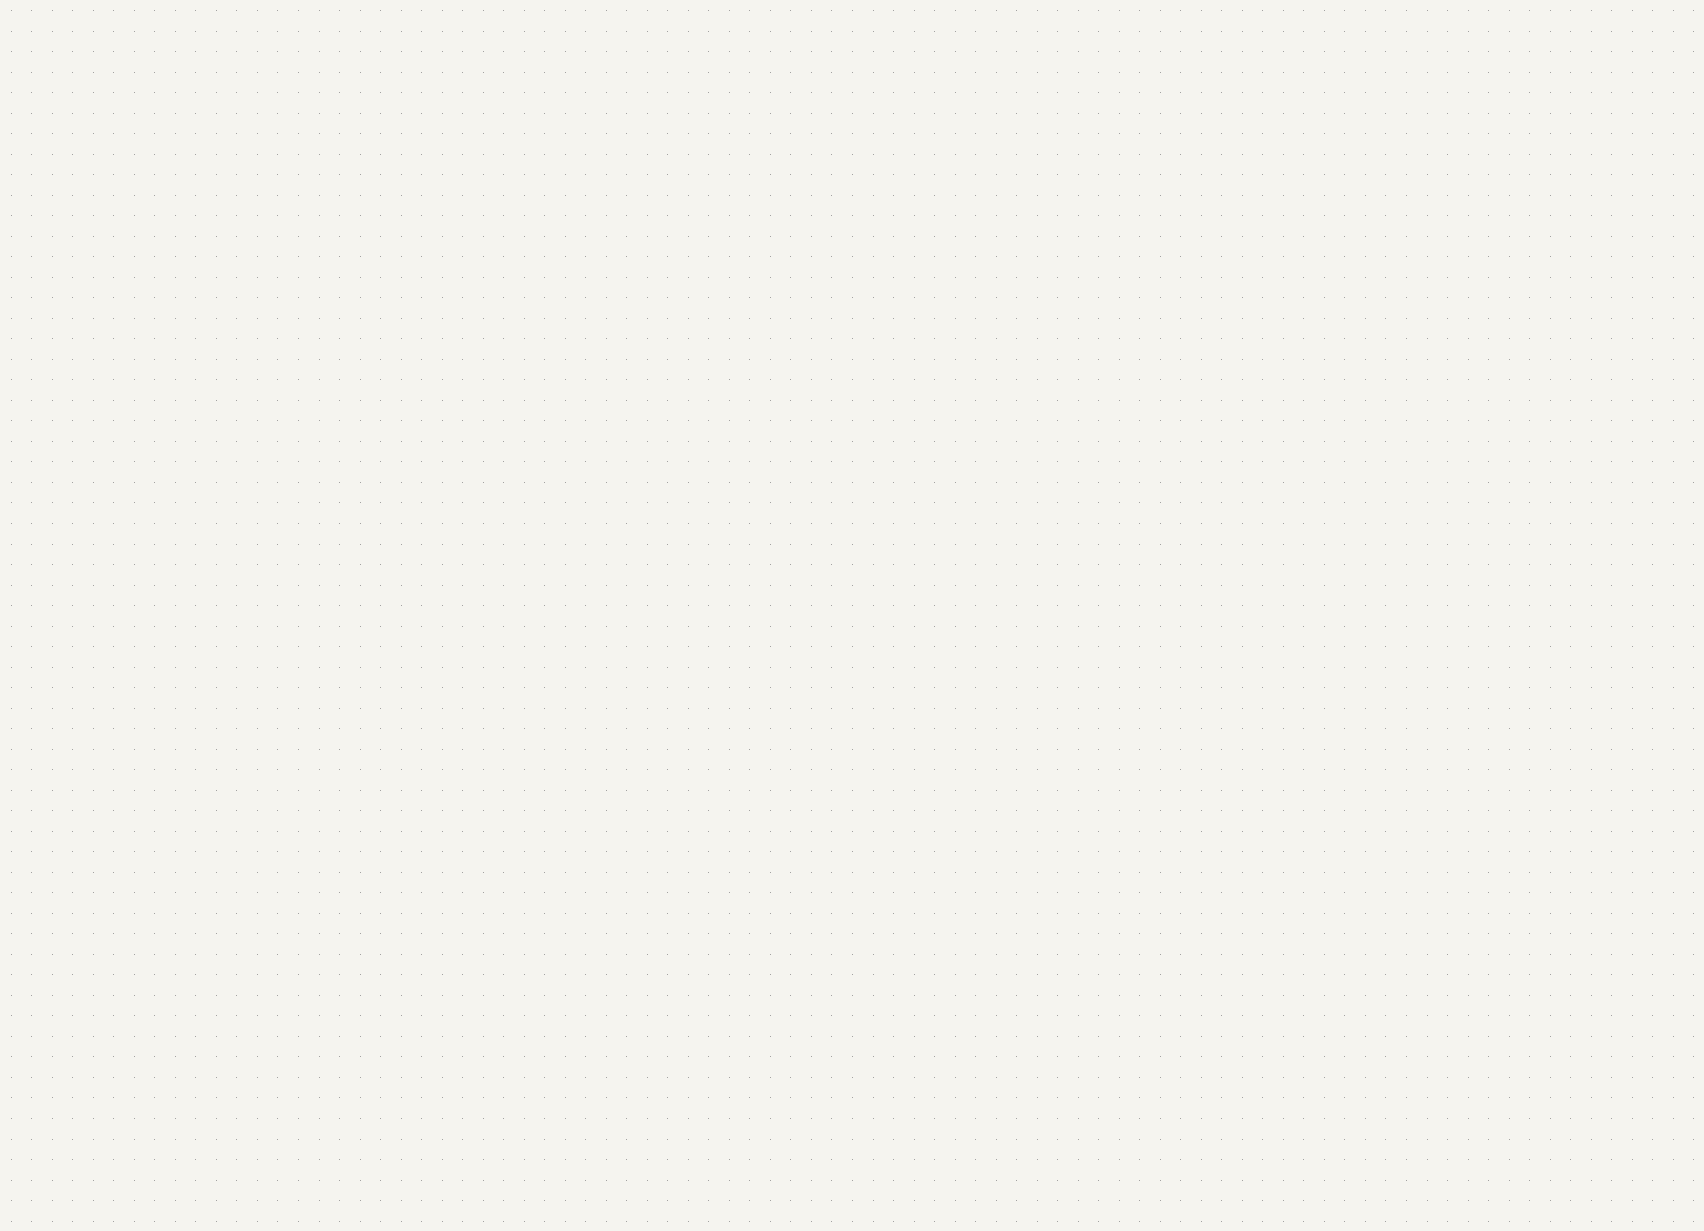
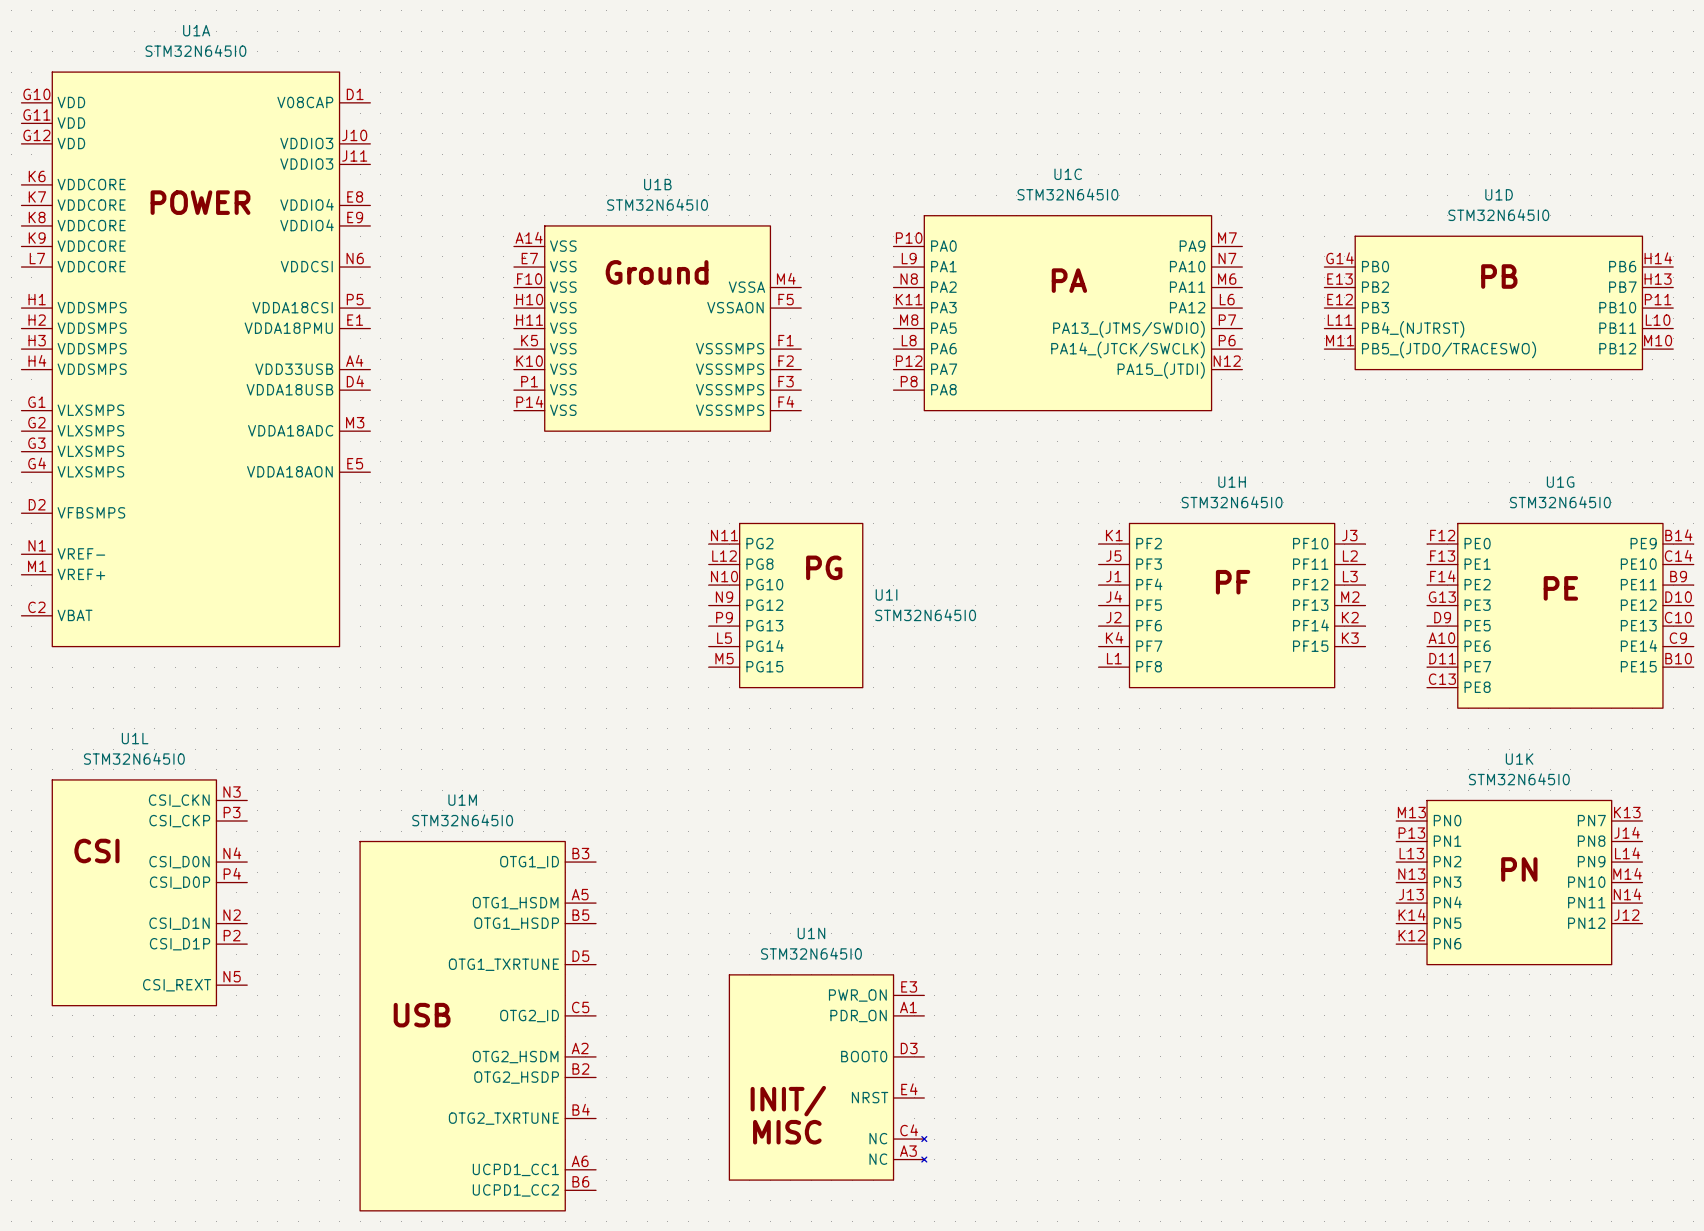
U1D: none -> STM32N645I0 (1498, 302)
U1C: none -> STM32N645I0 (1067, 313)
U1B: none -> STM32N645I0 (657, 328)
U1A: none -> STM32N645I0 (195, 359)
U1I: none -> STM32N645I0 (785, 605)
U1H: none -> STM32N645I0 (1232, 605)
U1G: none -> STM32N645I0 (1560, 615)
U1K: none -> STM32N645I0 (1519, 882)
U1L: none -> STM32N645I0 (149, 892)
U1M: none -> STM32N645I0 (478, 1026)
U1N: none -> STM32N645I0 (828, 1077)

